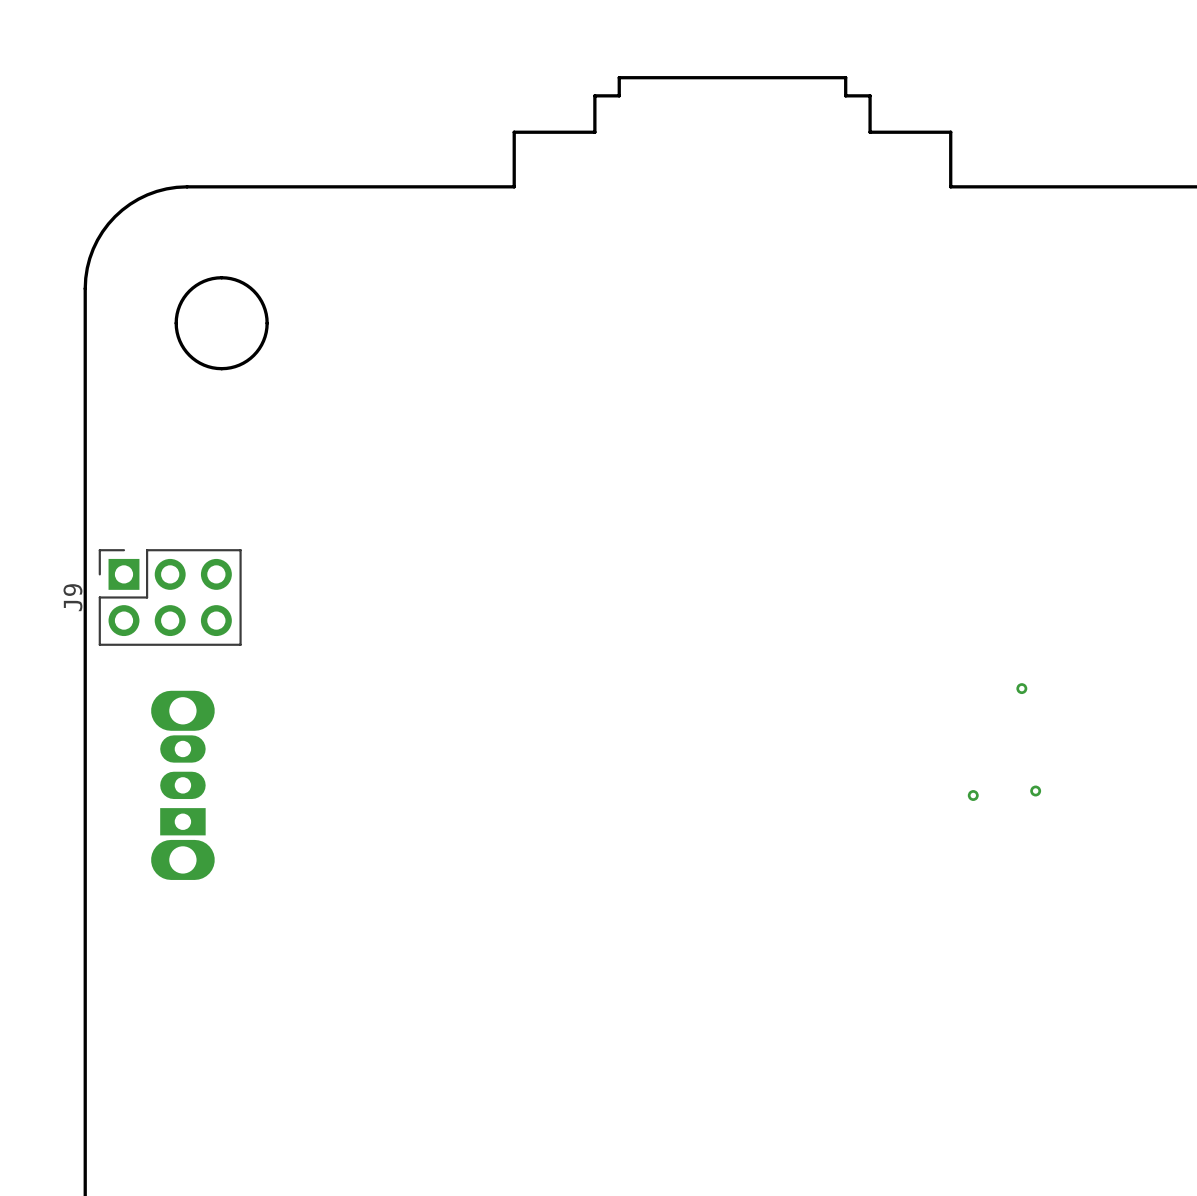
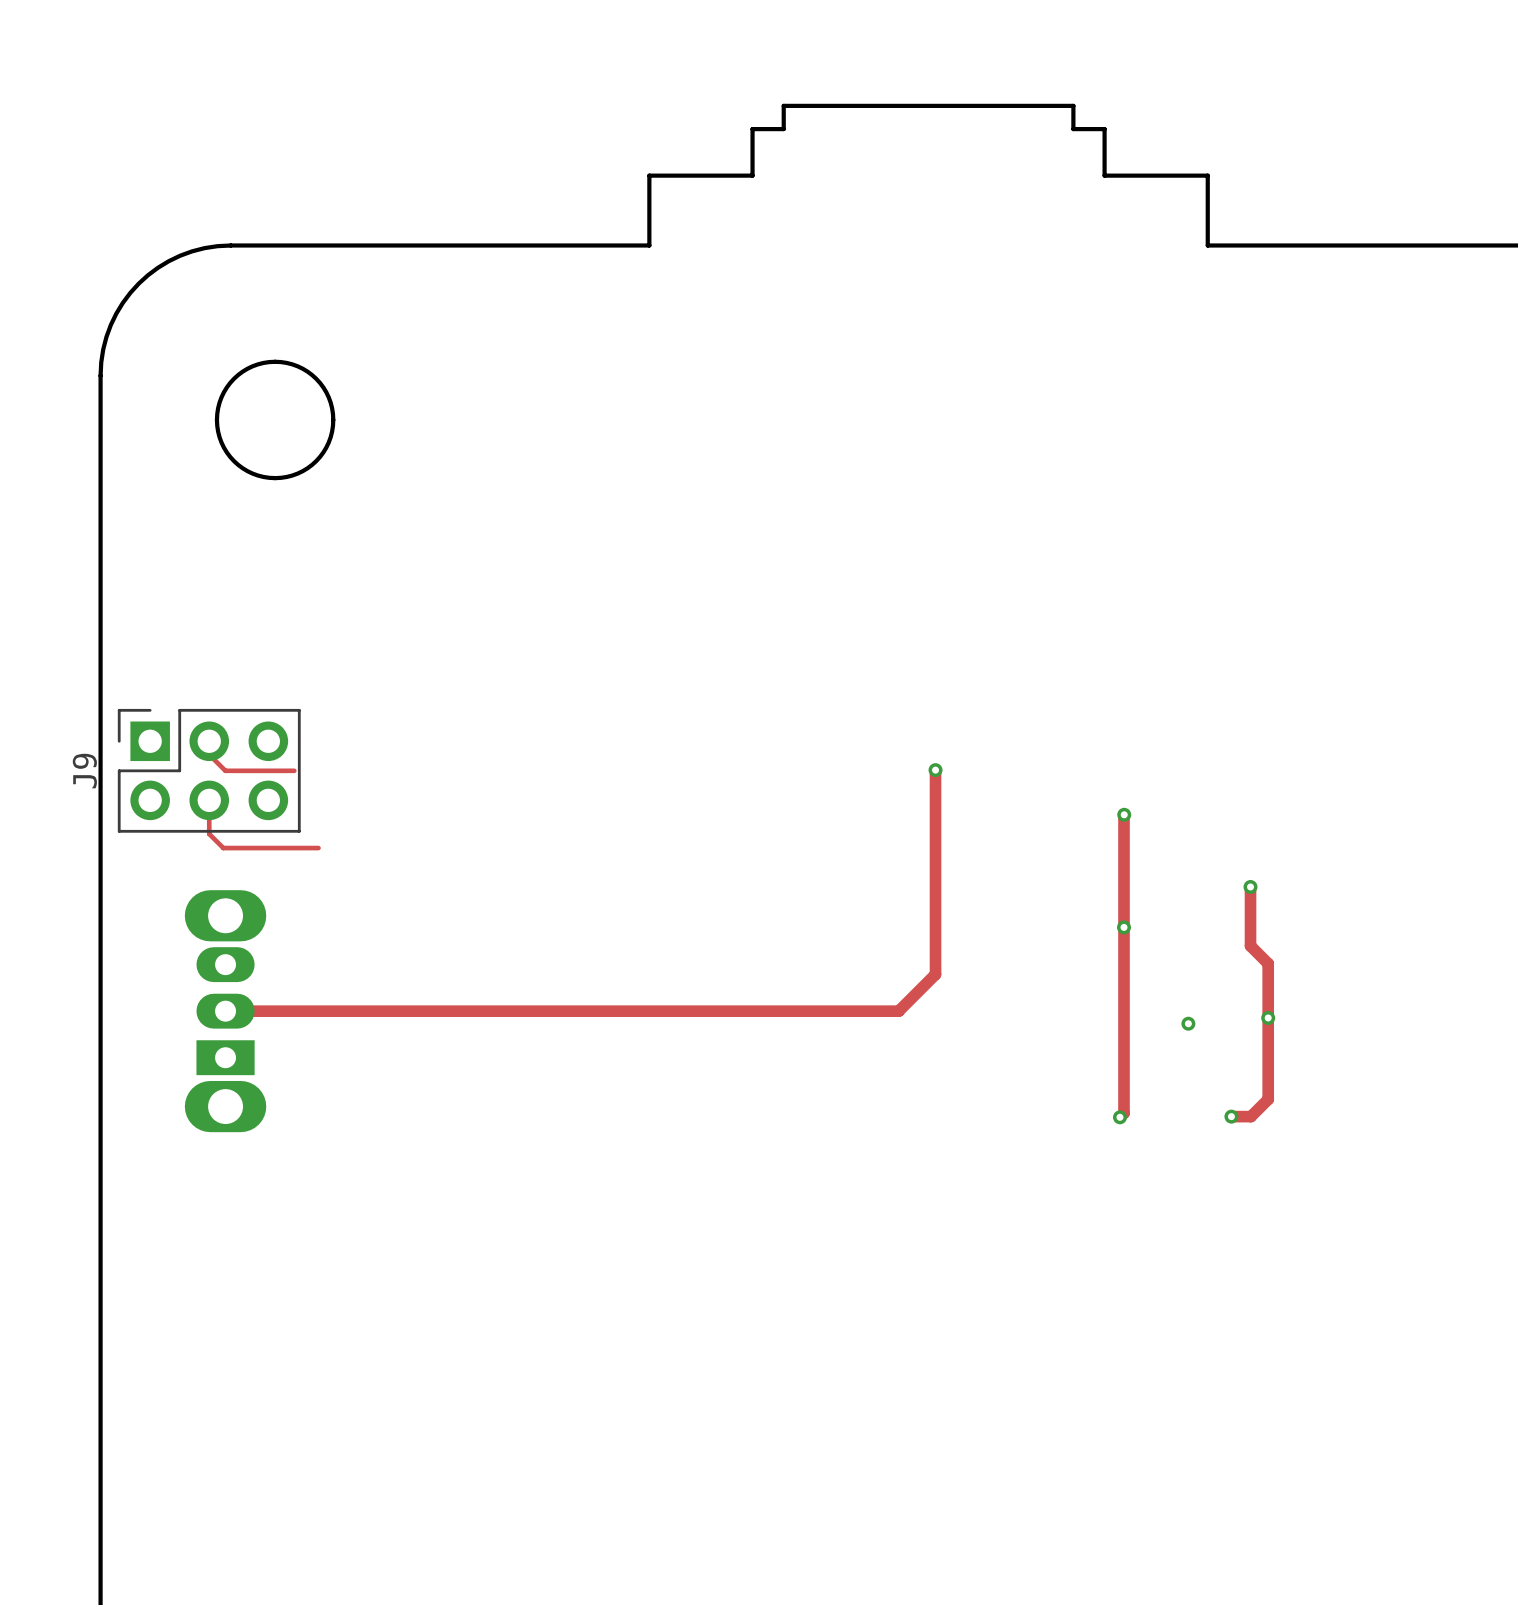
track: none -> (209, 741) (209, 754) (225, 770) (294, 770)
track: none -> (935, 770) (935, 974) (898, 1011) (225, 1011)
via: none -> (935, 770)
track: none -> (209, 800) (209, 833) (223, 848) (318, 848)
via: none -> (1124, 814)
track: none -> (1123, 815) (1123, 1113) (1119, 1117)
track: none -> (1250, 886) (1250, 945) (1268, 963) (1268, 1099) (1250, 1116) (1231, 1116)
via position: (1021, 688) -> (1250, 886)
via: none -> (1123, 927)
via: none -> (1268, 1017)
via: (1035, 791) -> none
via: none -> (1188, 1023)
via: (973, 795) -> none
via: none -> (1231, 1116)
via: none -> (1119, 1117)

